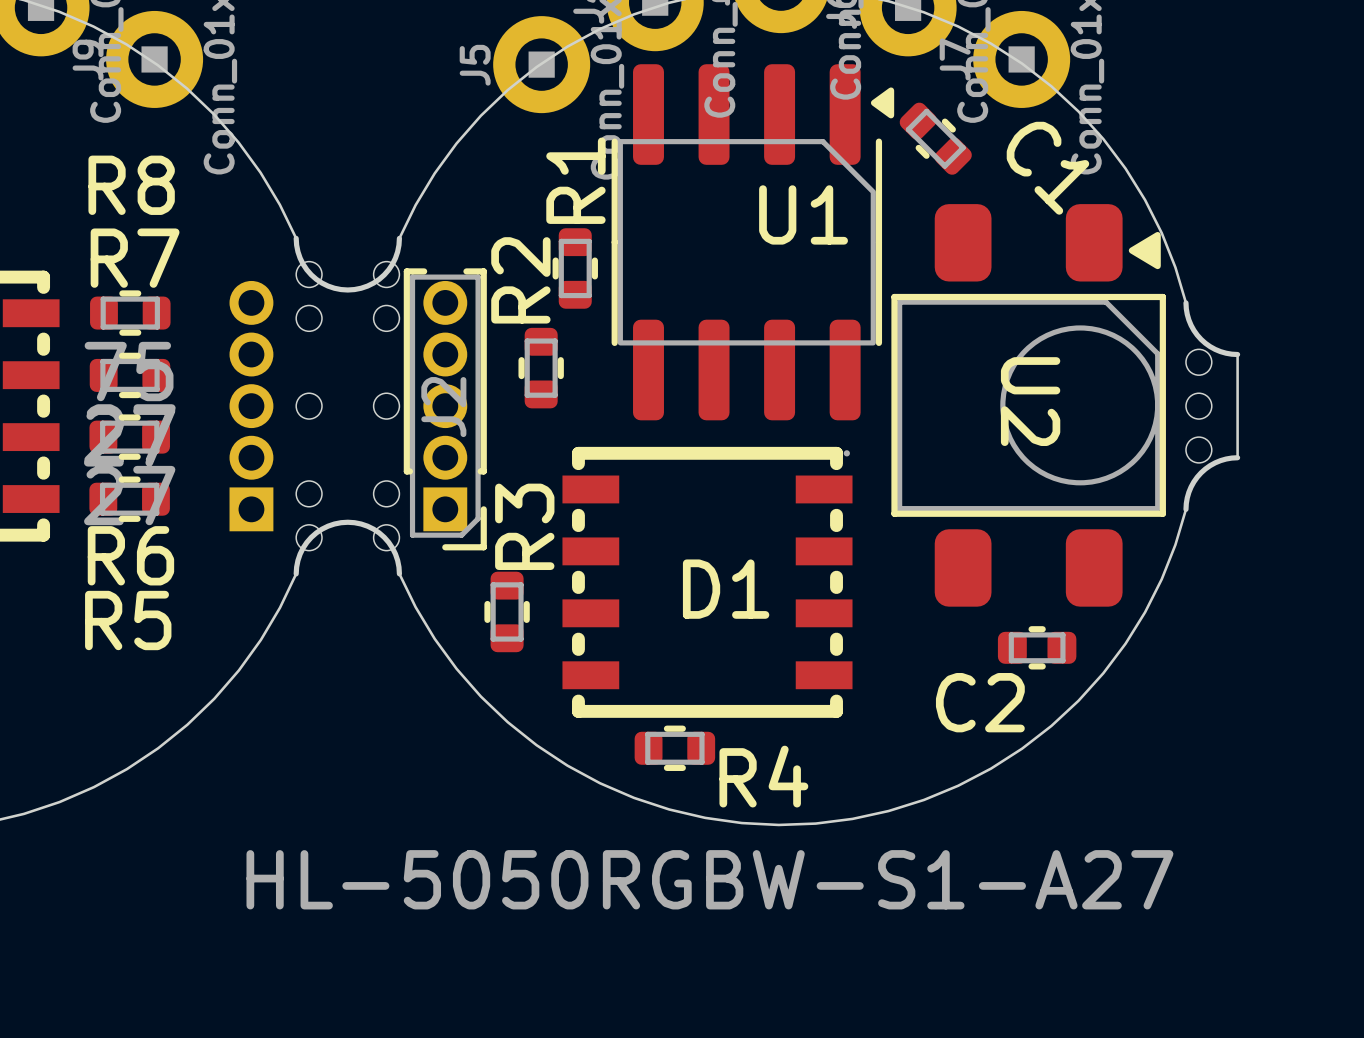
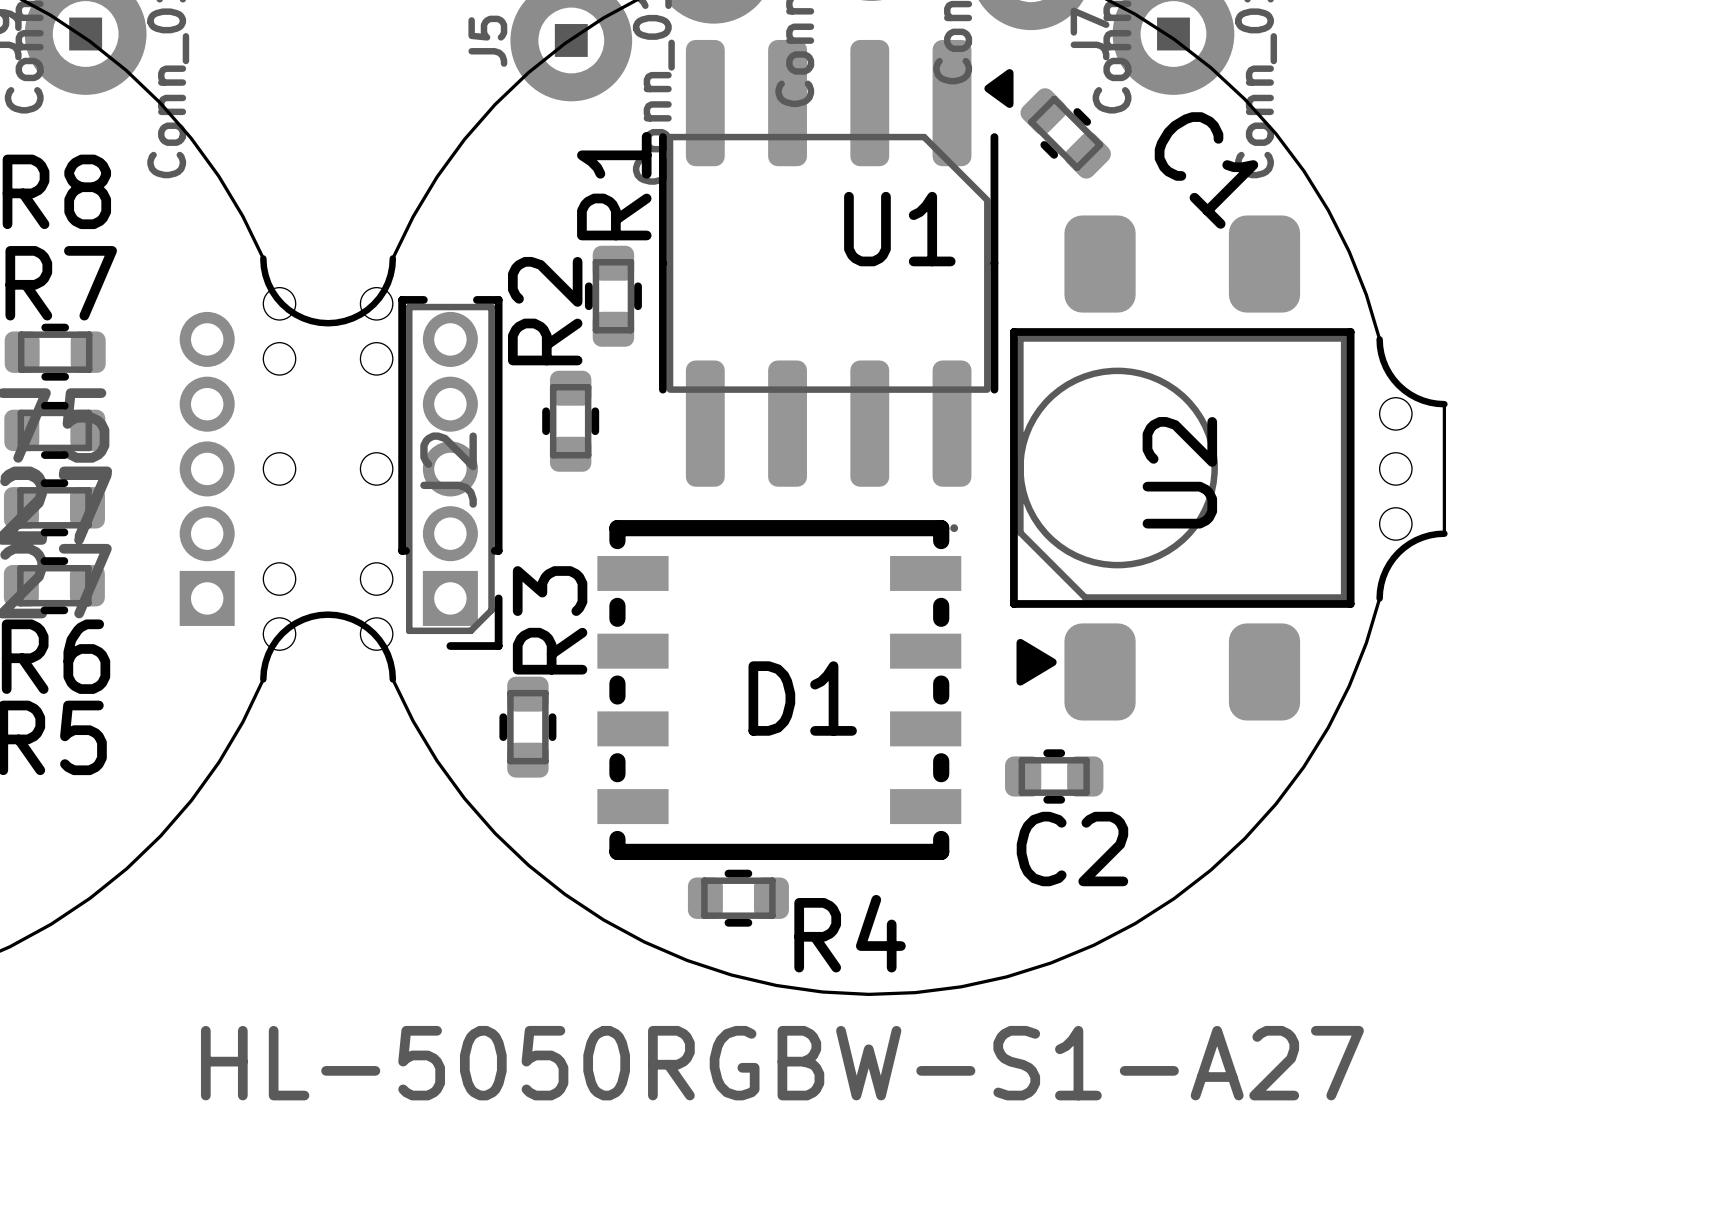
U2 rotation: 0° (1028, 405) -> 180° (1182, 467)
C2 position: (1037, 647) -> (1054, 776)
C2 name position: C2 (980, 702) -> C2 (1072, 849)

